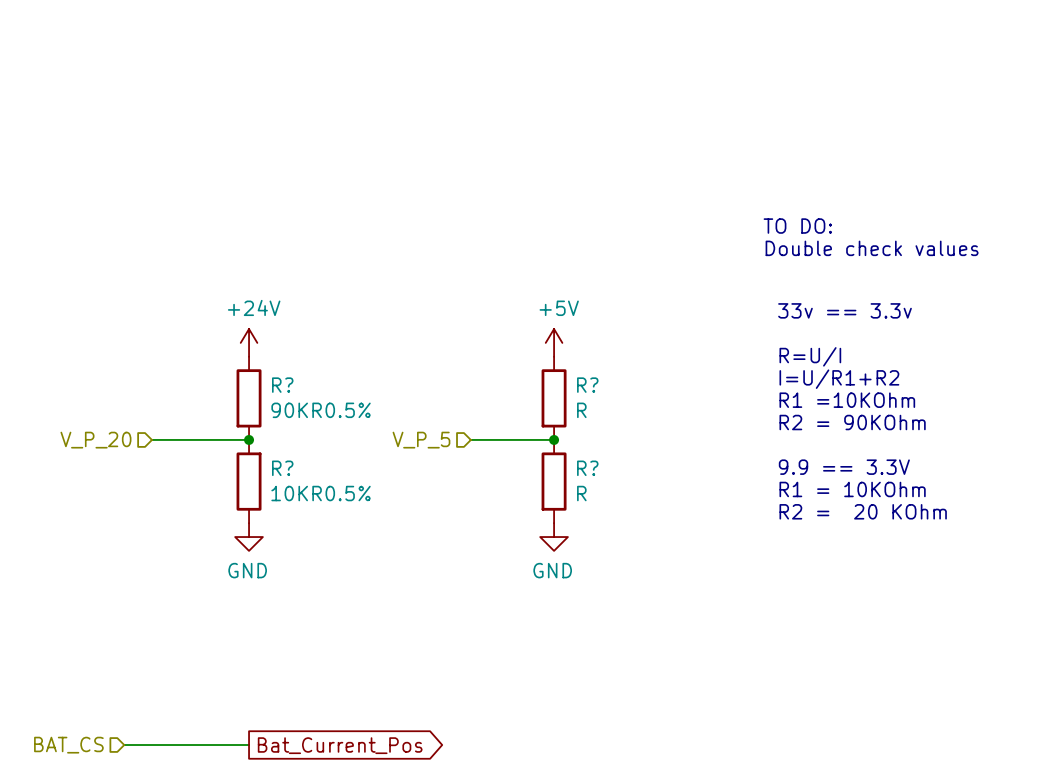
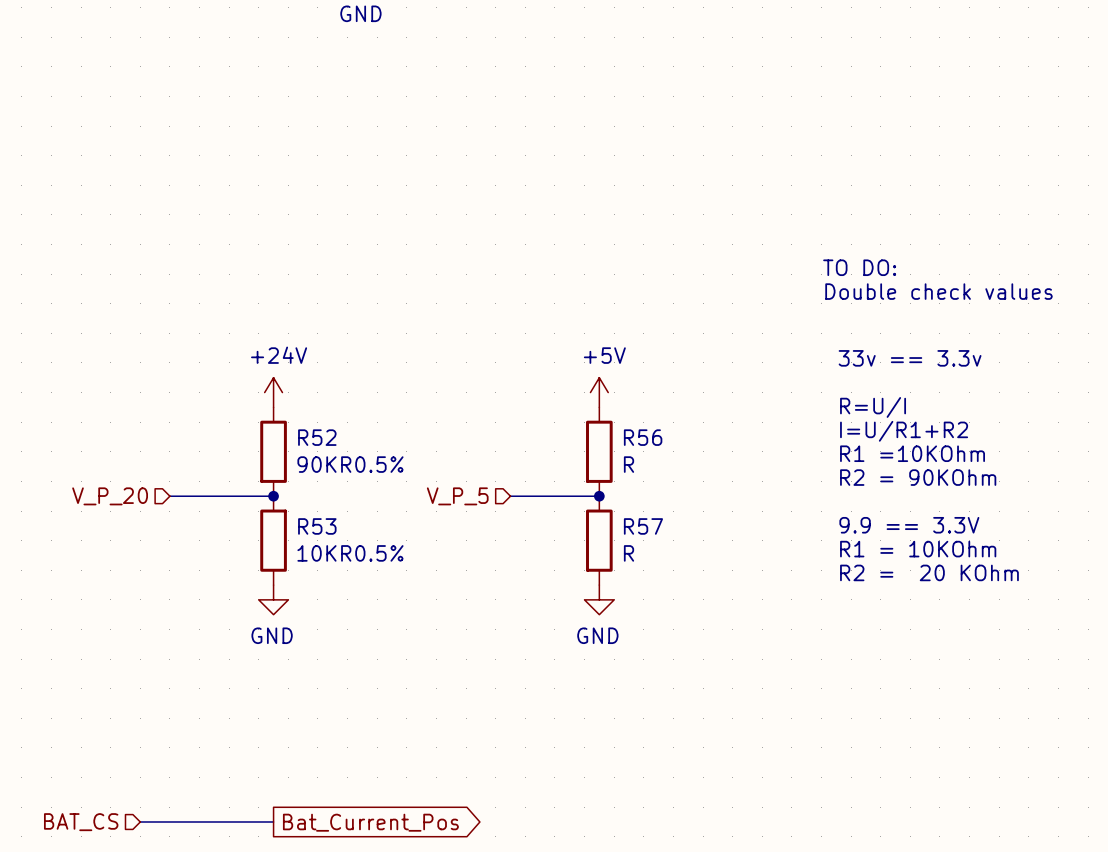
R? name: R? (282, 385) -> R52 (317, 437)
R? name: R? (587, 385) -> R56 (643, 437)
R? name: R? (282, 468) -> R53 (317, 526)
R? name: R? (587, 468) -> R57 (643, 526)

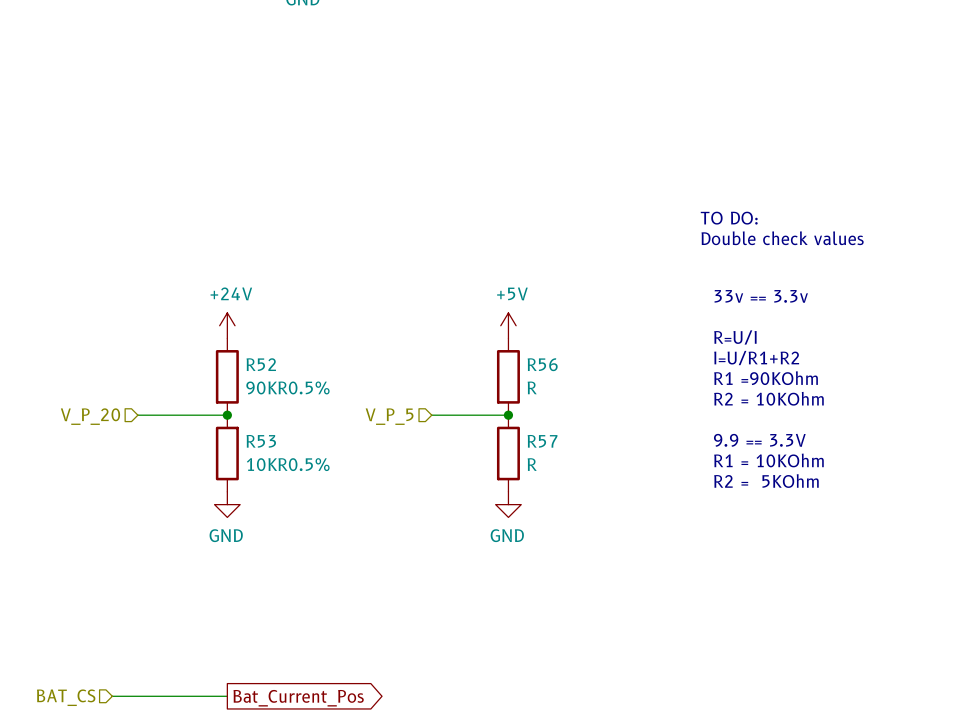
text: R1 =10KOhm (912, 453) -> R1 =90KOhm (766, 378)
text: R2 = 90KOhm (918, 477) -> R2 = 10KOhm (768, 398)
text: R2 = 20 KOhm (929, 572) -> R2 = 5KOhm (766, 481)

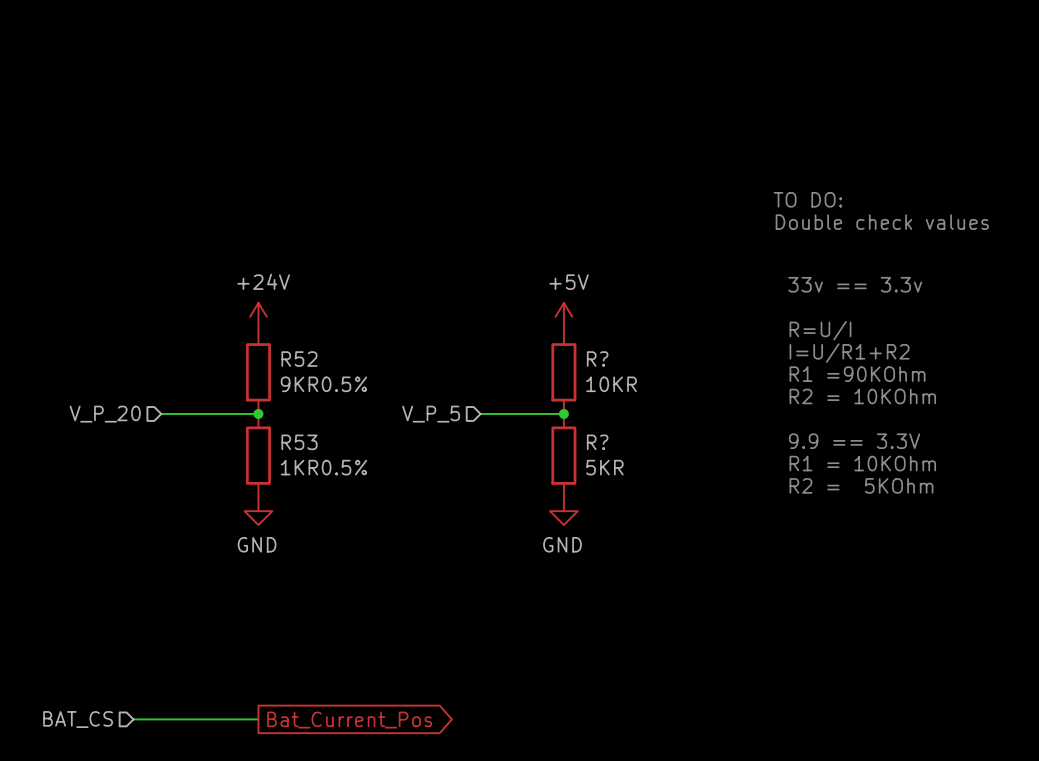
R56 name: R56 (542, 364) -> R? (597, 359)
R52 value: 90KR0.5% (287, 387) -> 9KR0.5% (323, 384)
R56 value: R (532, 387) -> 10KR (611, 384)
R57 name: R57 (542, 441) -> R? (597, 442)
R53 value: 10KR0.5% (288, 464) -> 1KR0.5% (323, 467)
R57 value: R (532, 464) -> 5KR (604, 467)

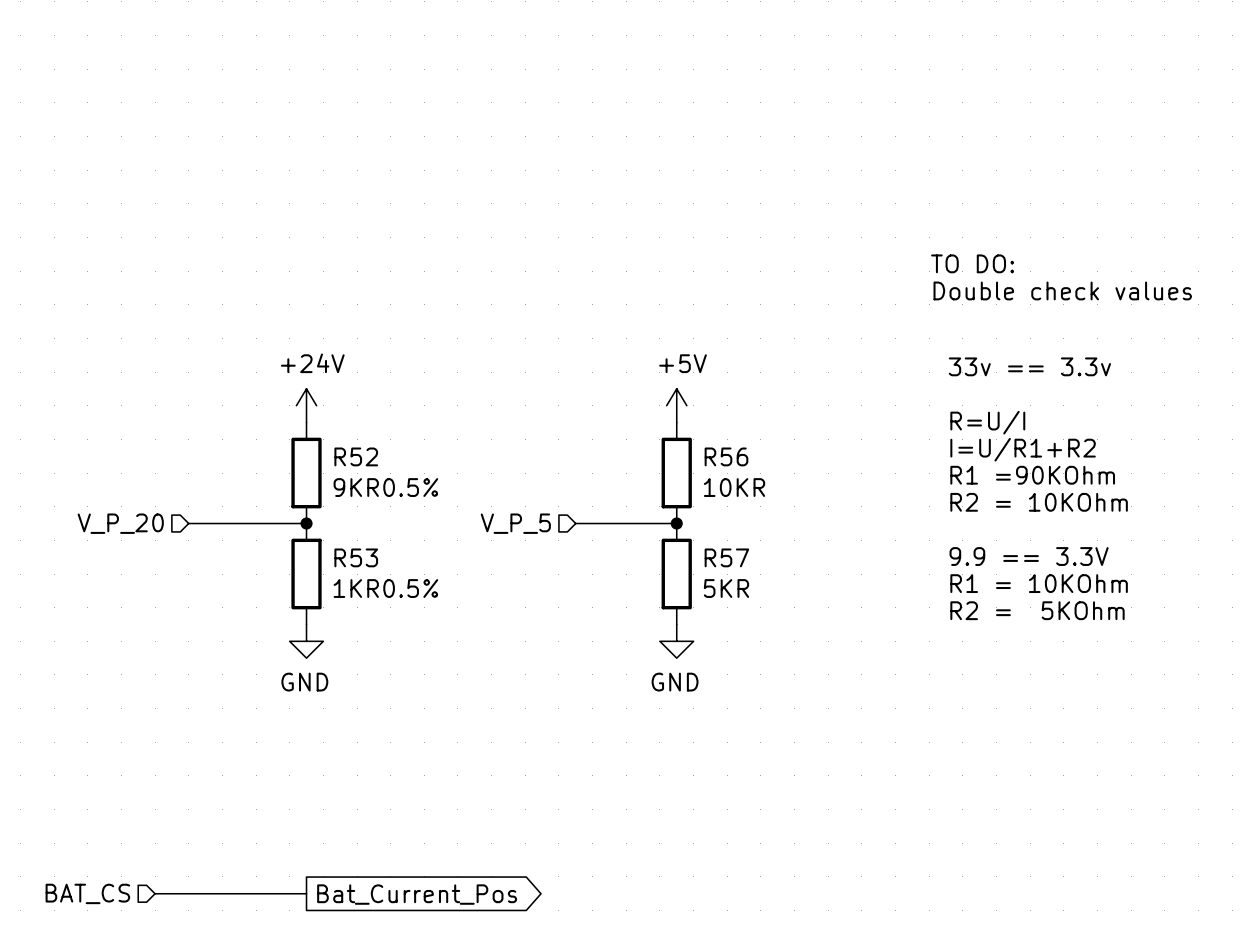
R? name: R? (597, 359) -> R56 (726, 456)
R? name: R? (597, 442) -> R57 (726, 557)

